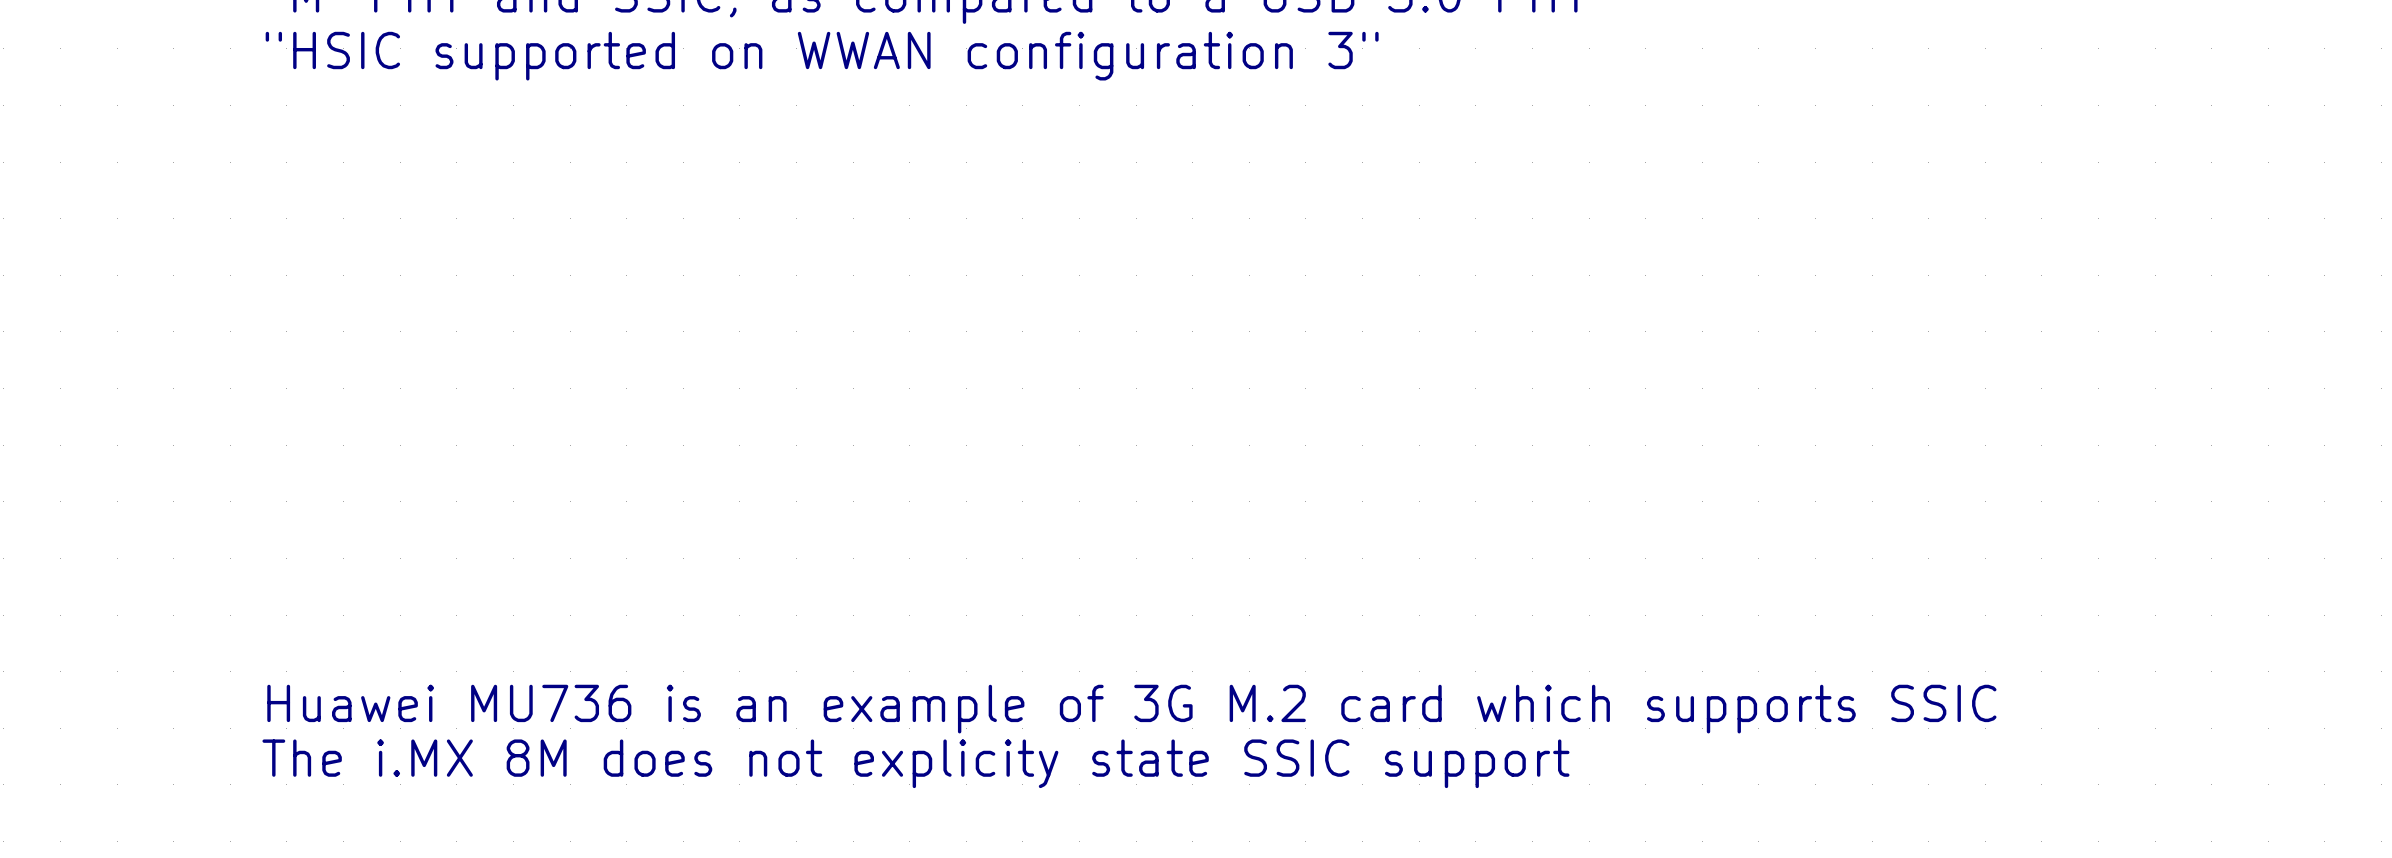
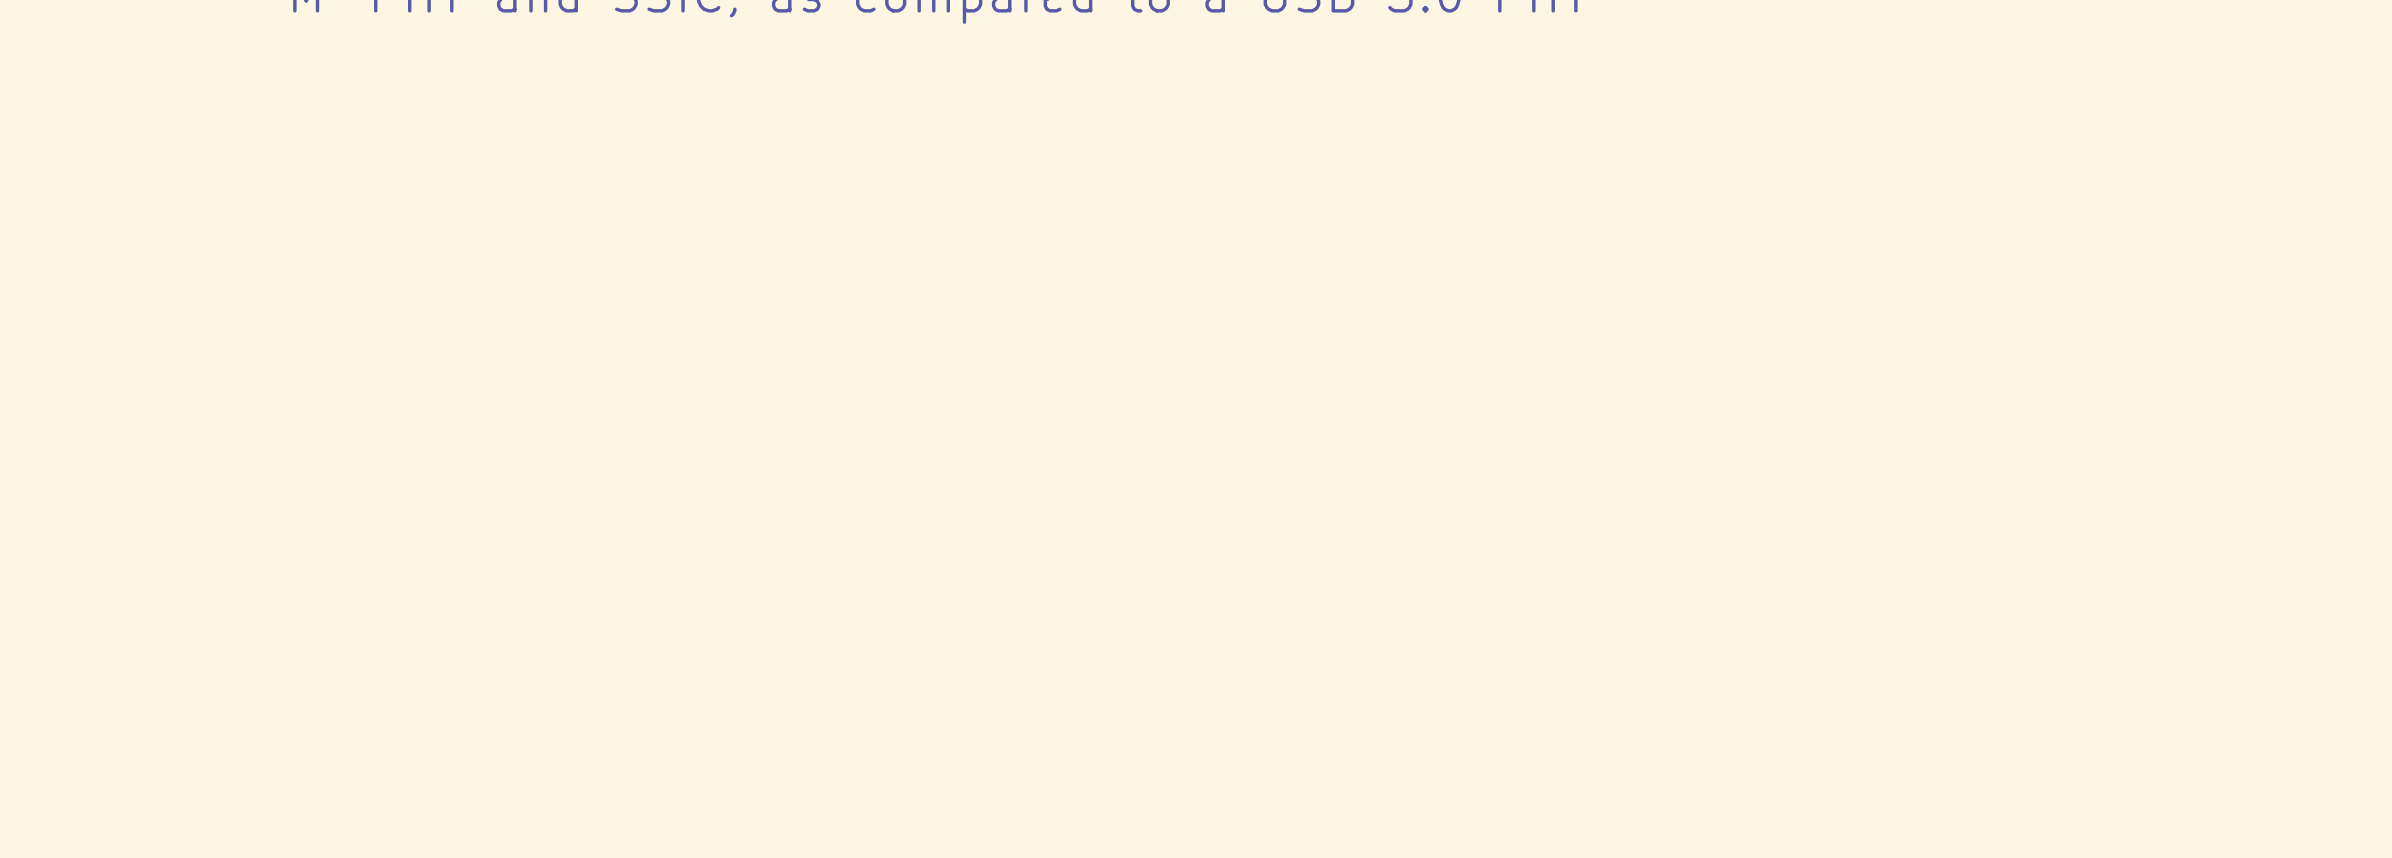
text: "HSIC supported on WWAN configuration 3" (822, 56) -> none
text: Huawei MU736 is an example of 3G M.2 card which supports SSIC (1131, 709) -> none
text: The i.MX 8M does not explicity state SSIC support (915, 763) -> none

